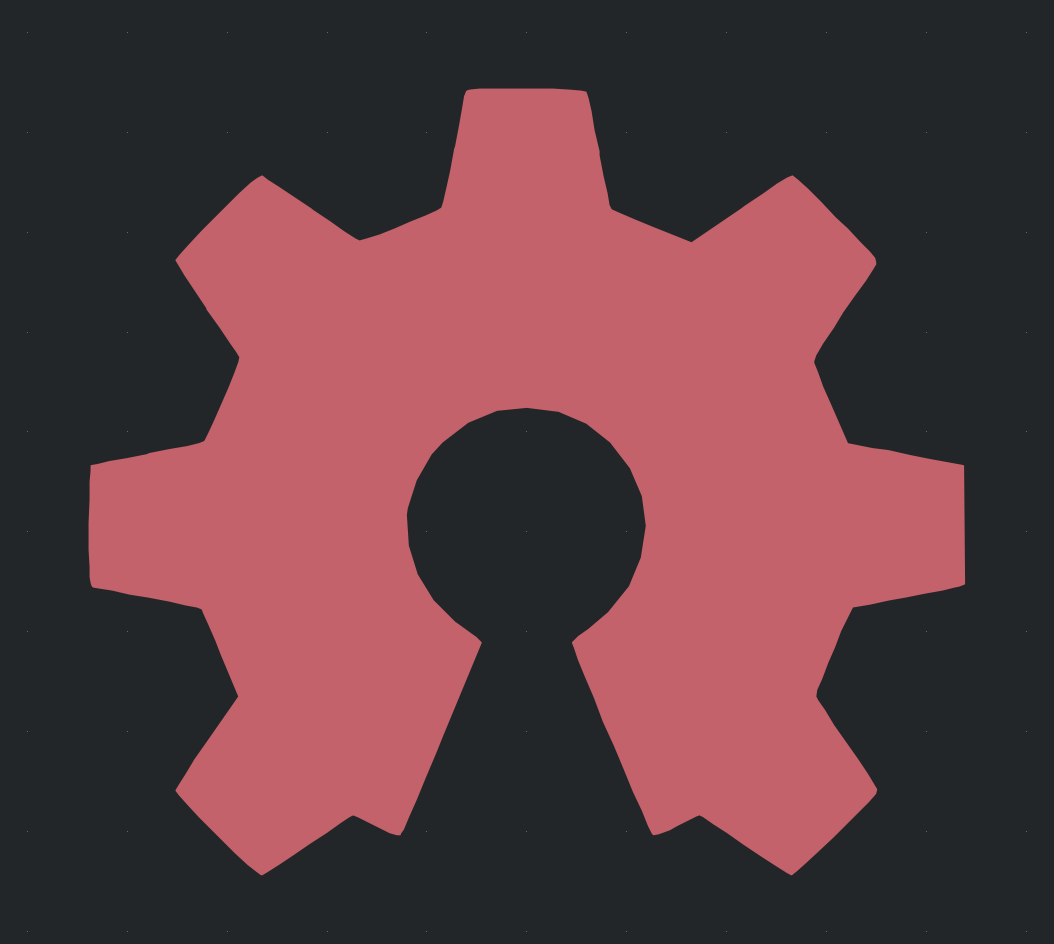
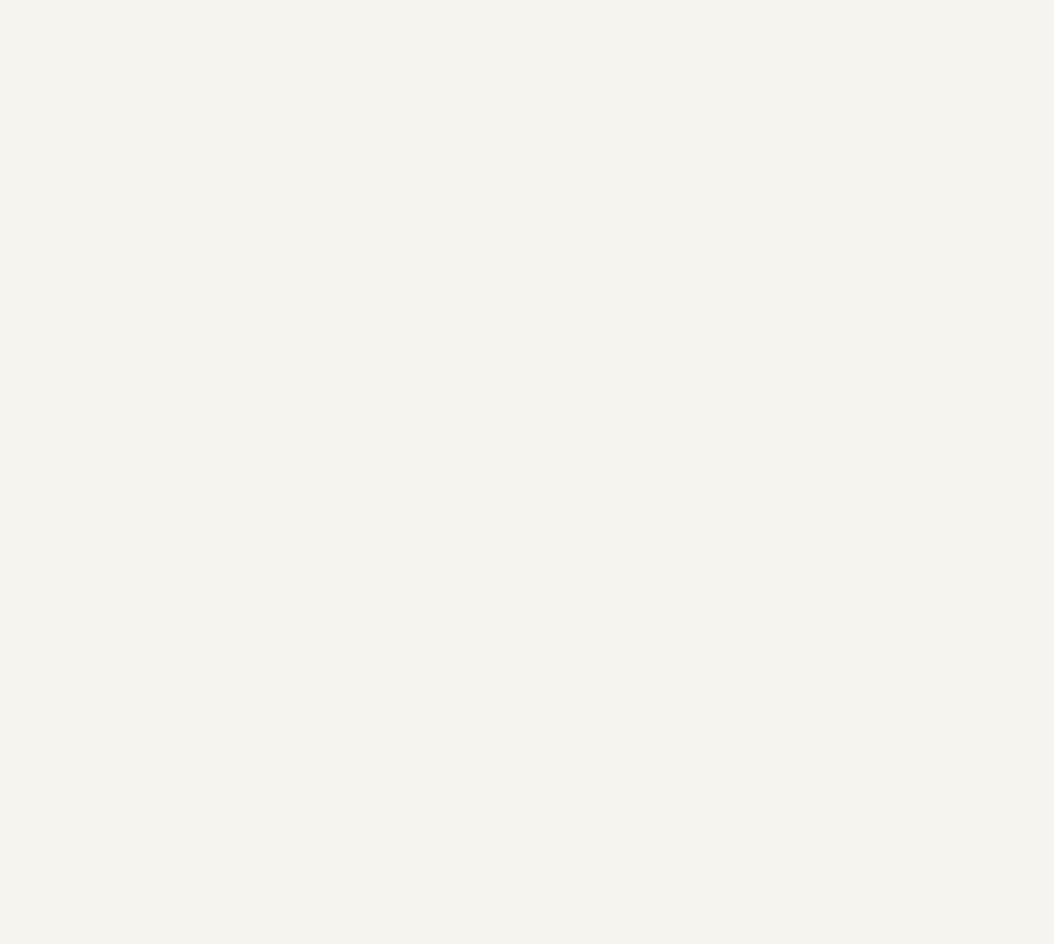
part: (526, 481) -> none

